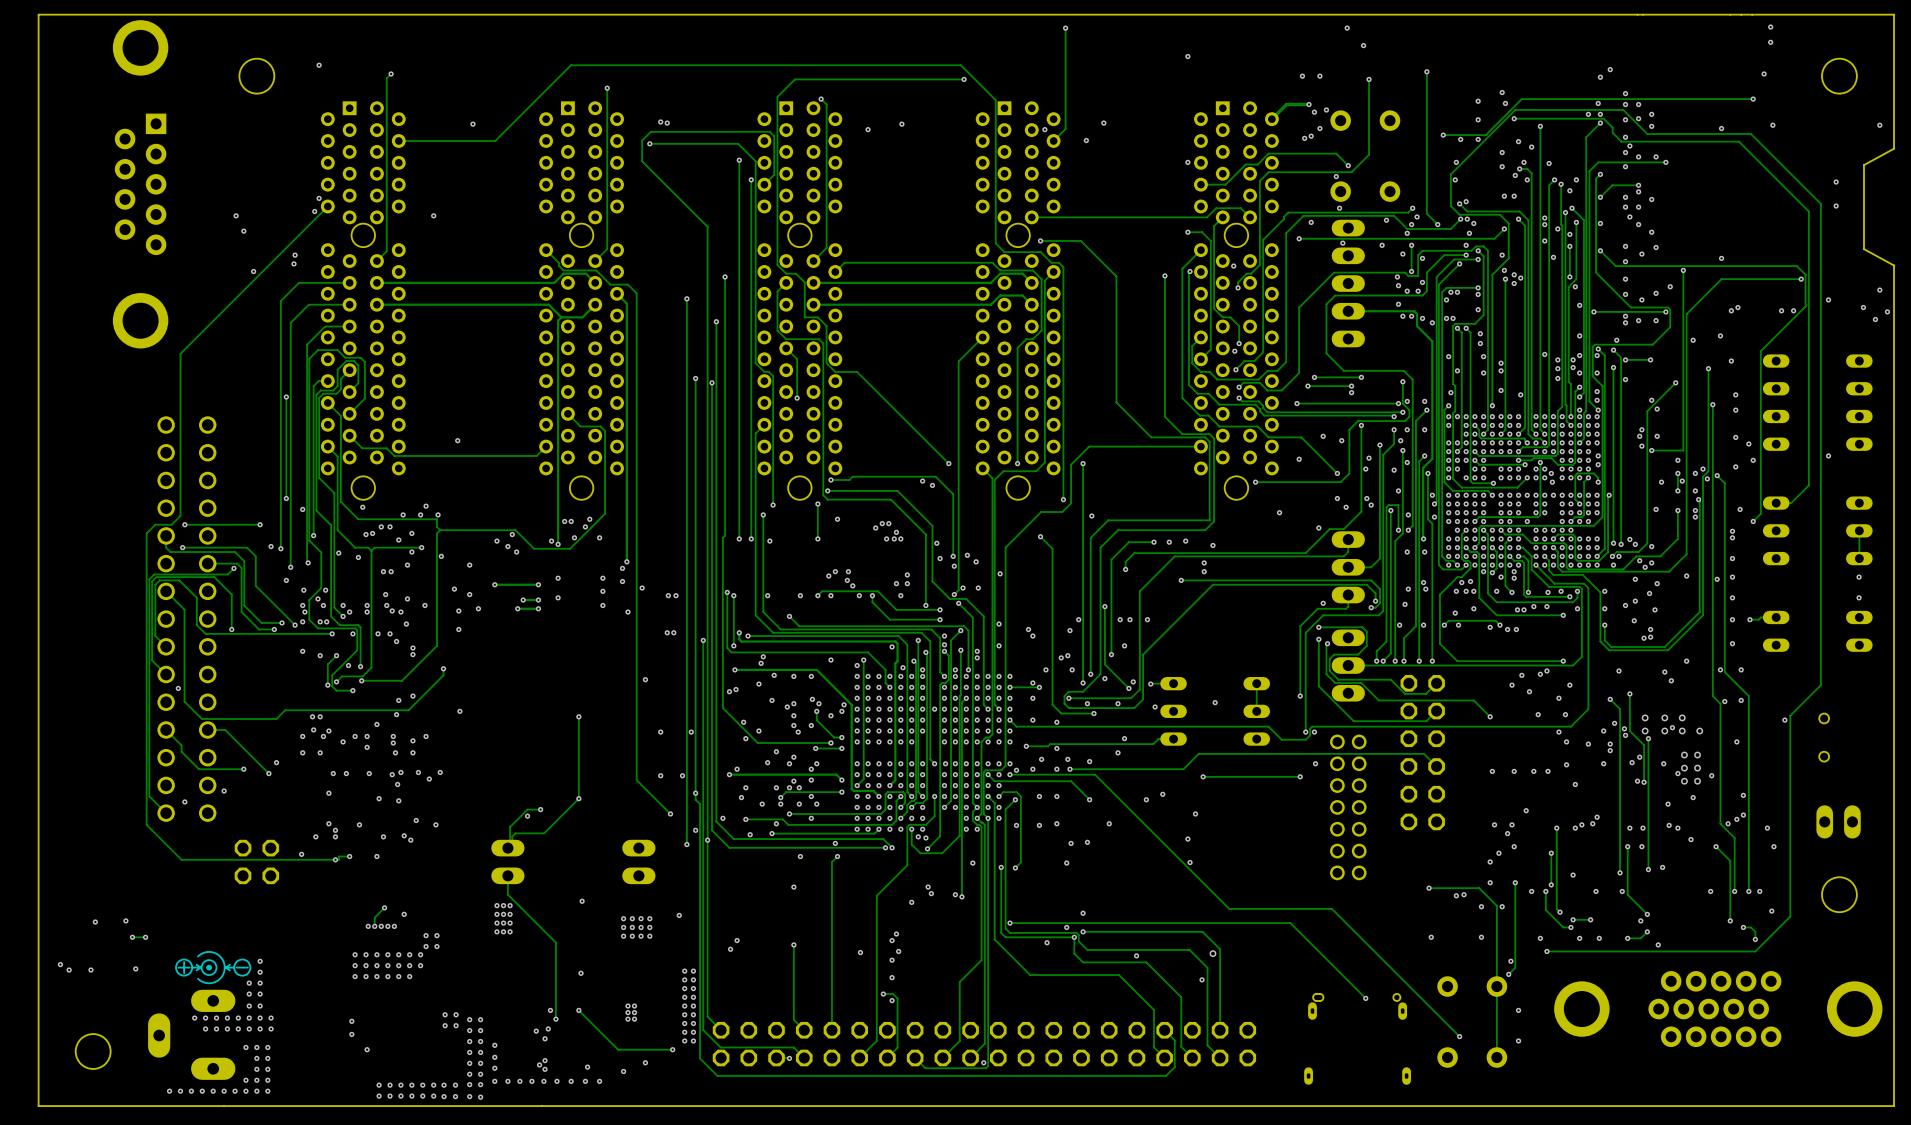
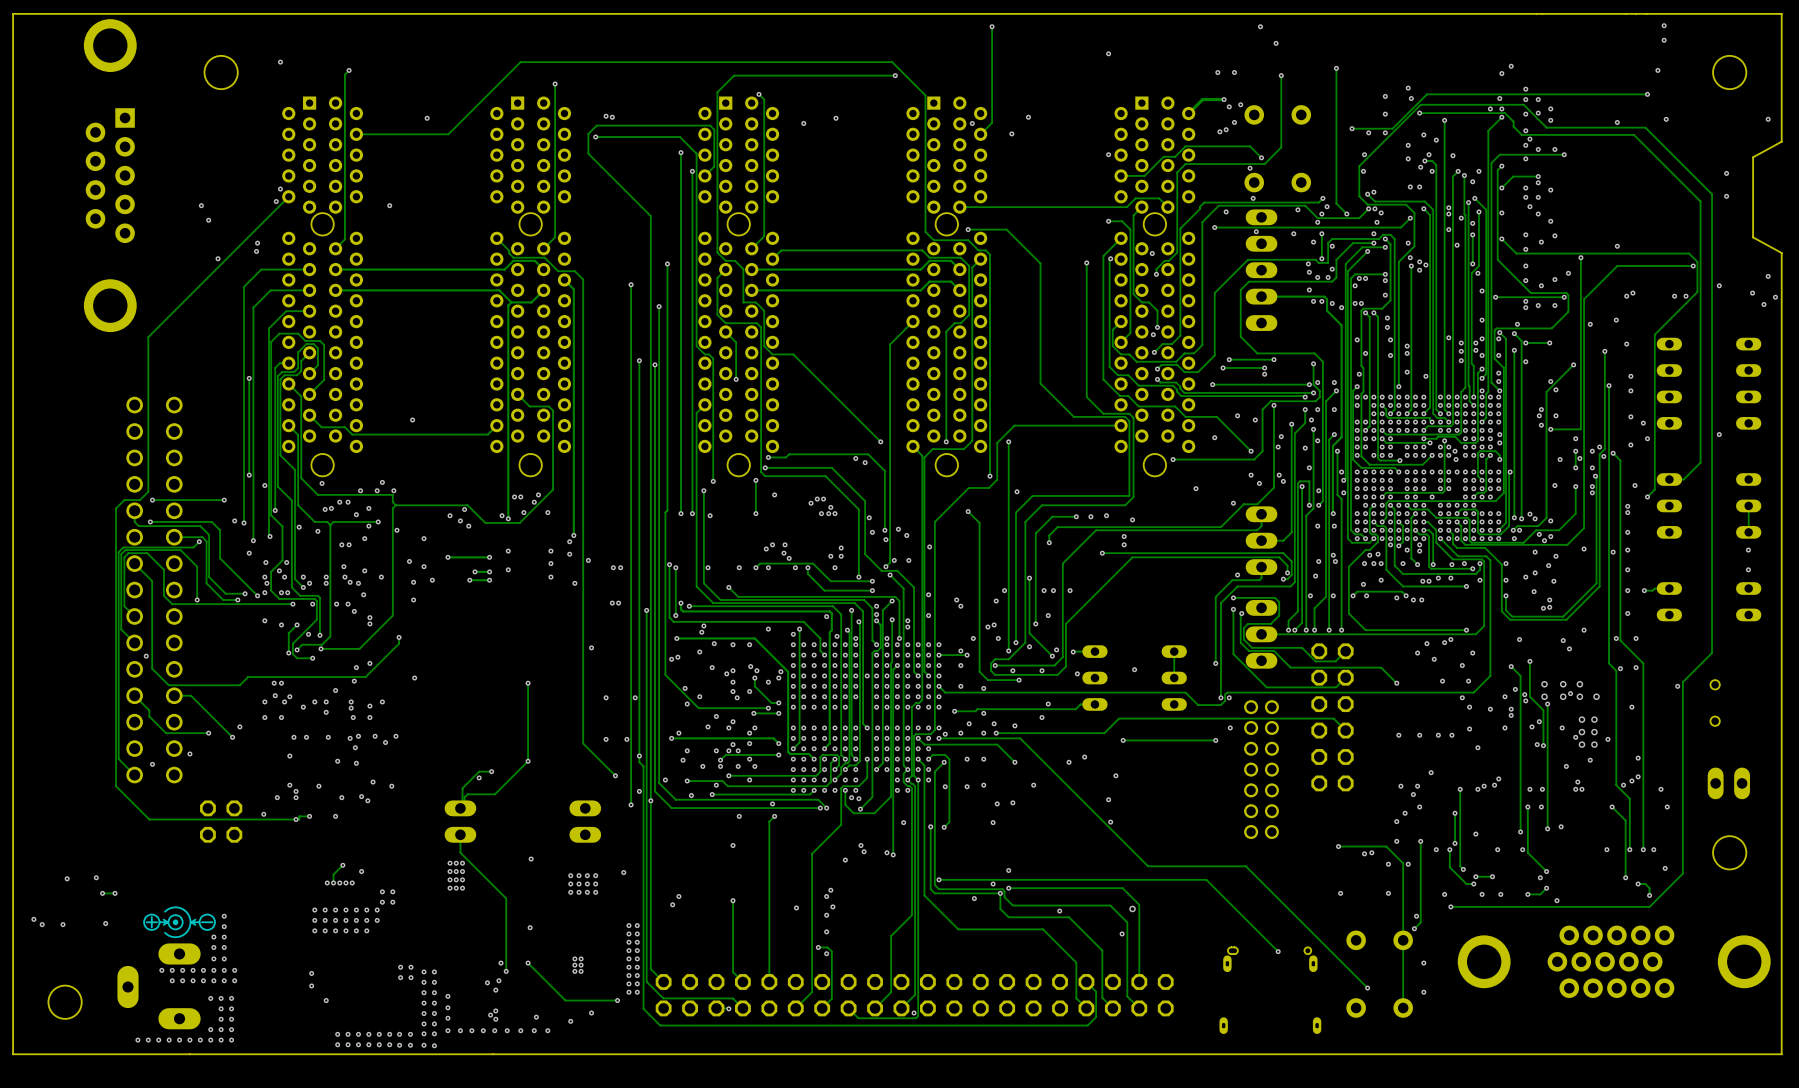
via: none -> (1577, 782)
via: (1669, 825) -> none
via: none -> (1581, 789)
via: (1691, 839) -> none

